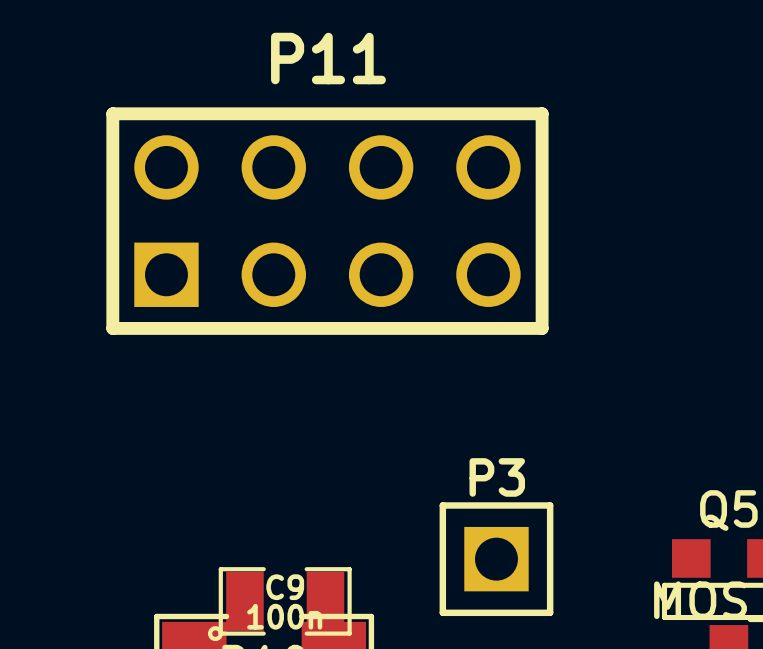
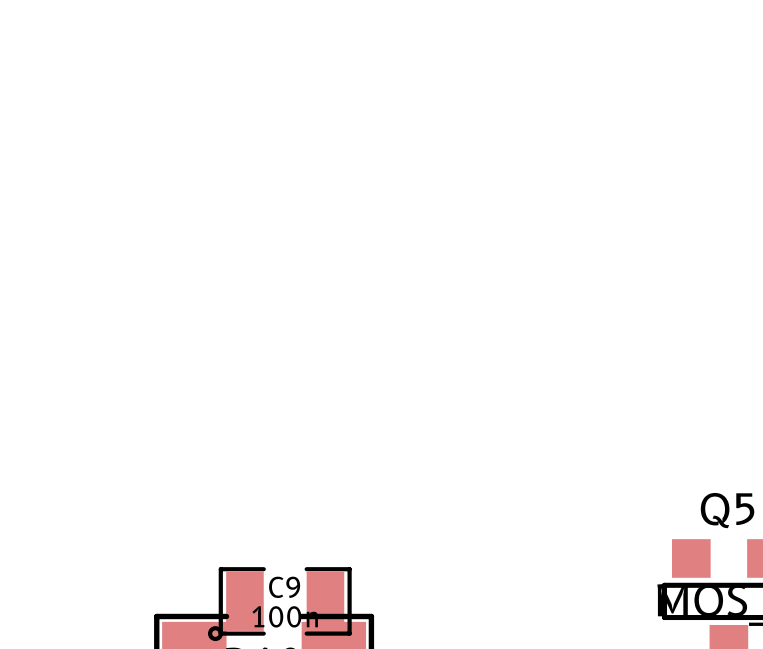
P11: (327, 221) -> none
P3: (496, 559) -> none

